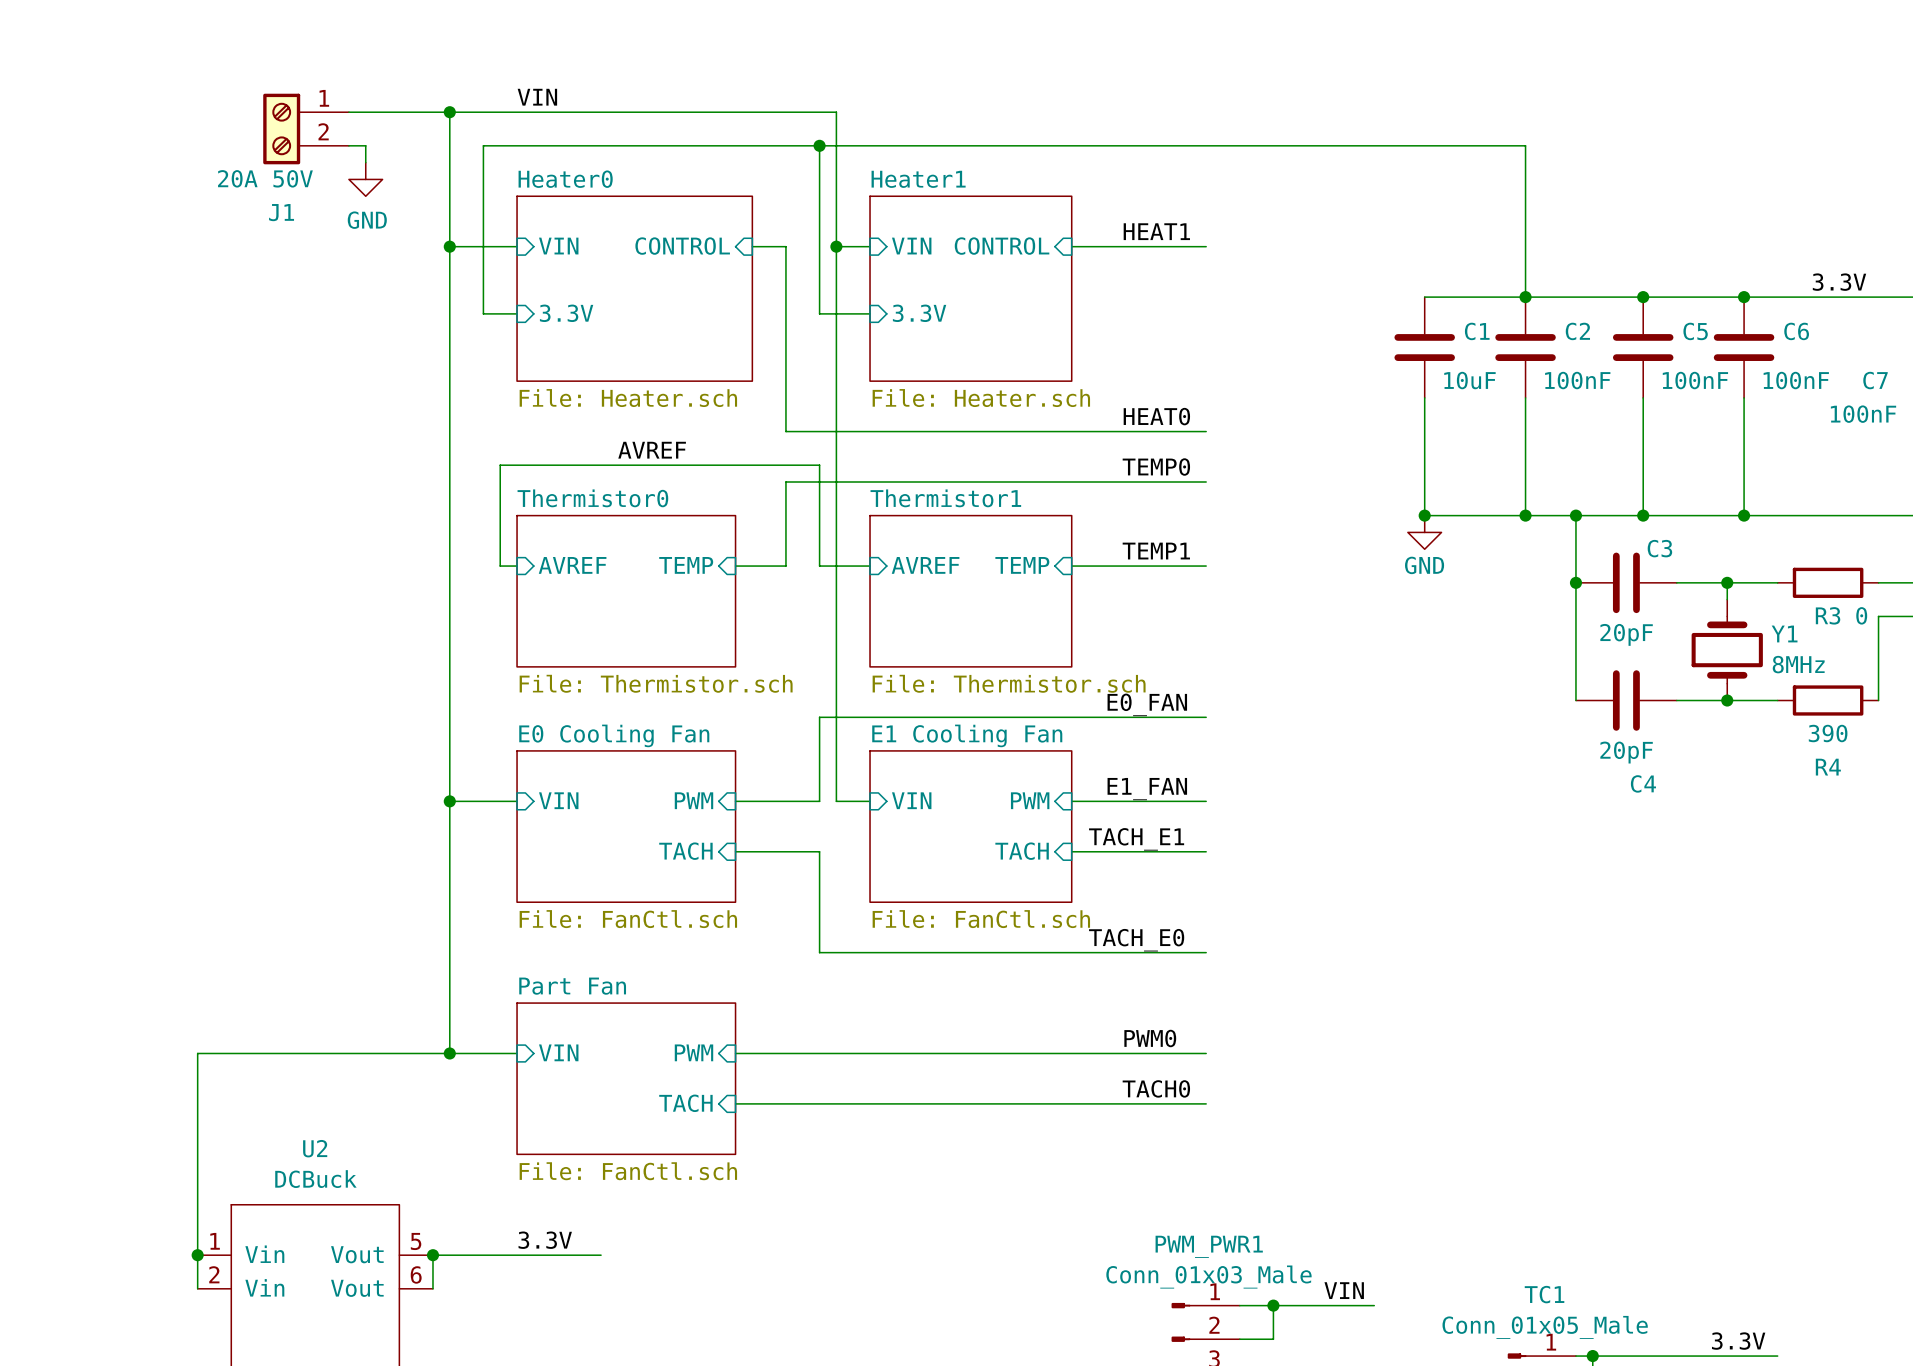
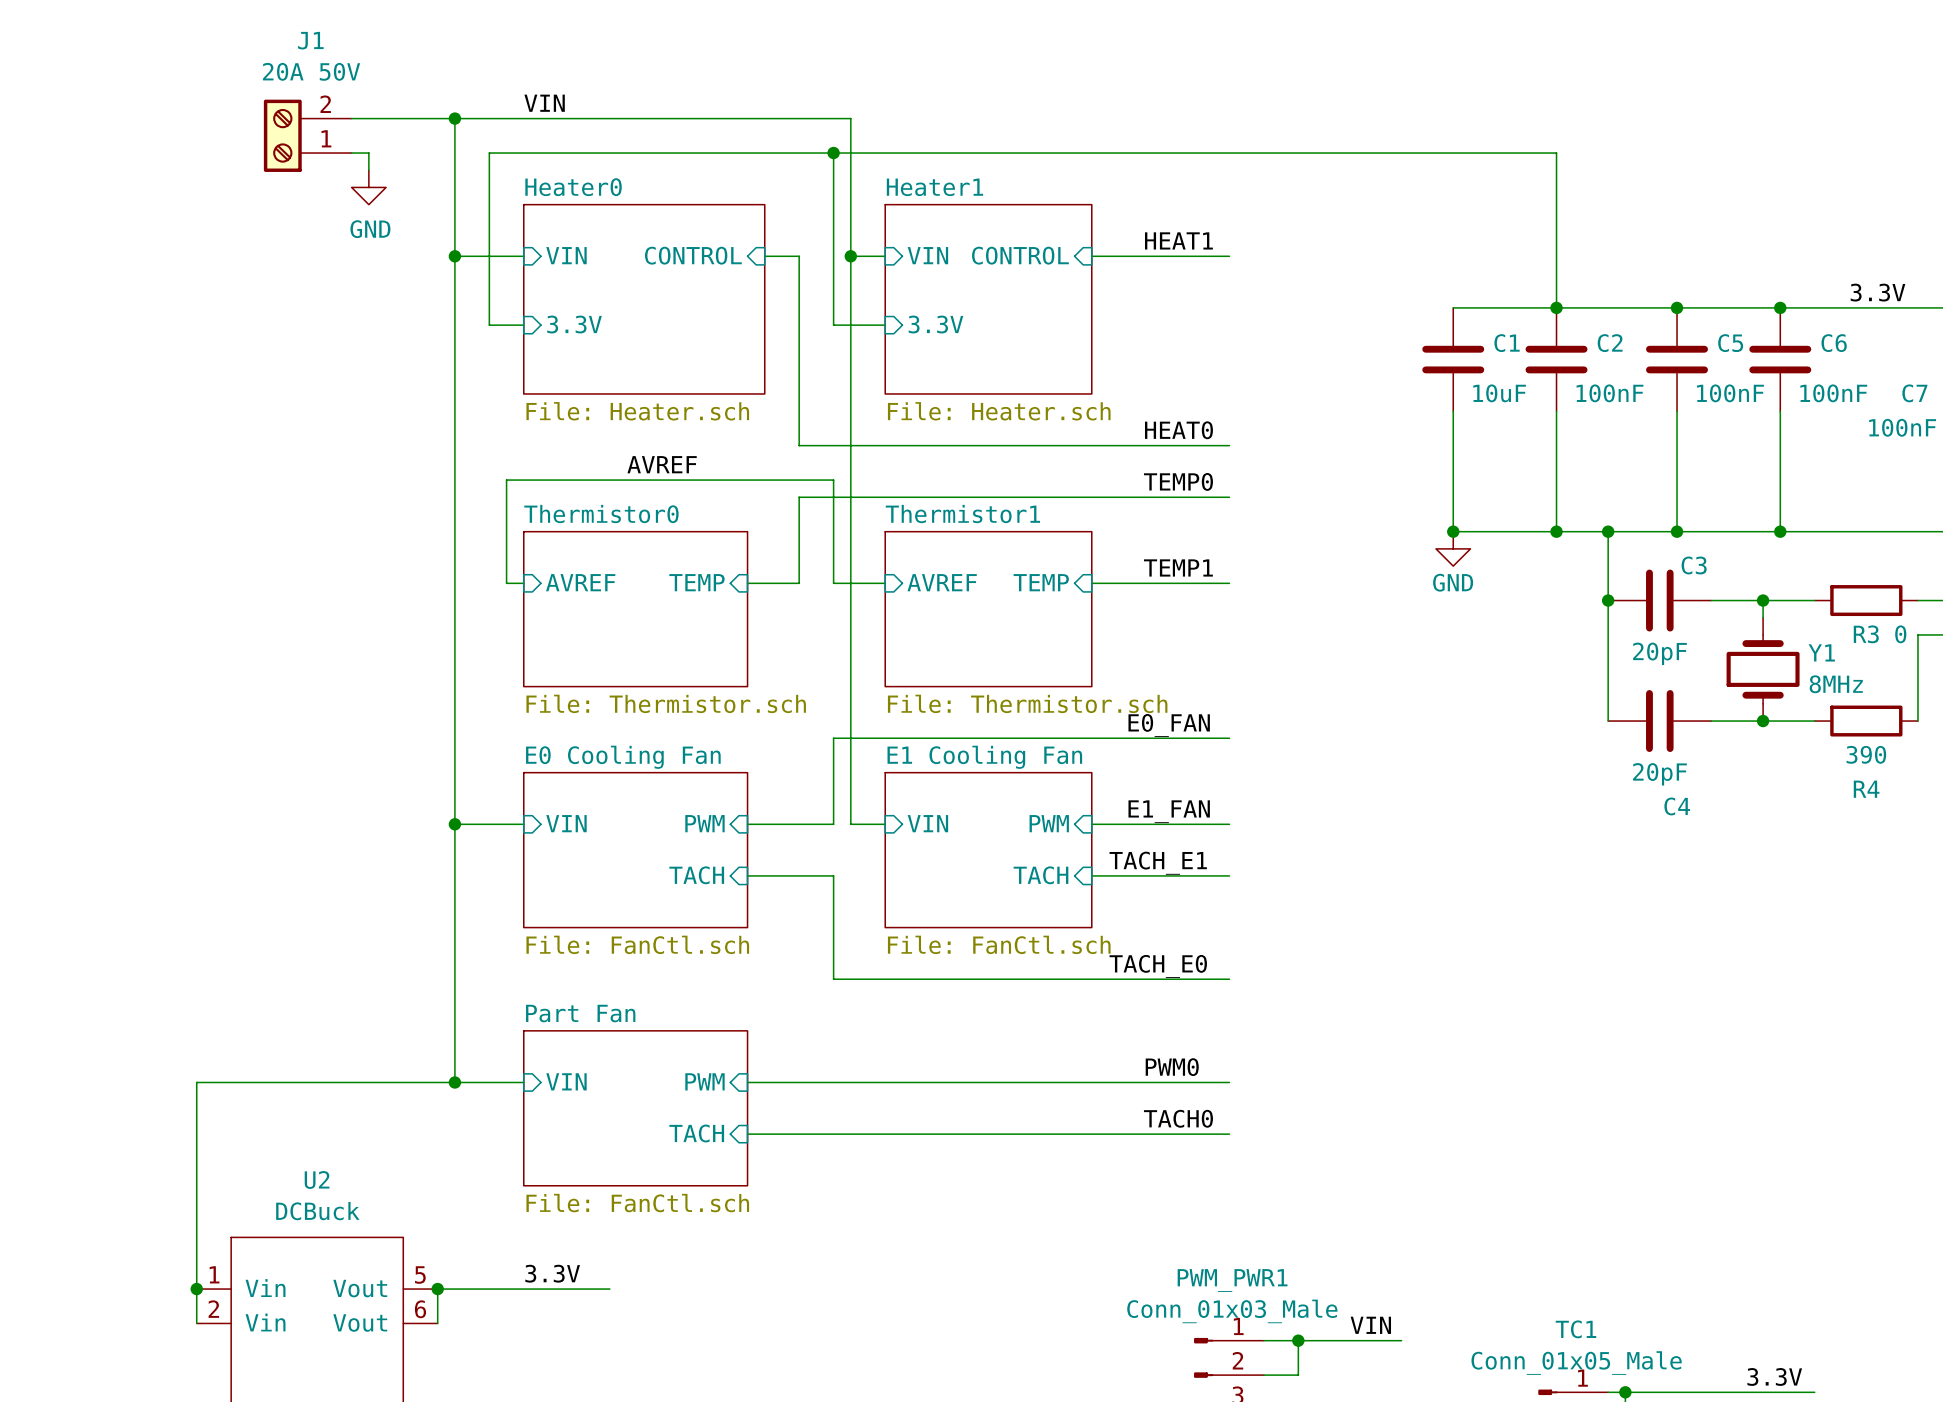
J1 flip: as is (281, 129) -> up-down (282, 135)
J1 value position: 20A 50V (265, 178) -> 20A 50V (311, 71)
J1 name position: J1 (281, 212) -> J1 (310, 40)

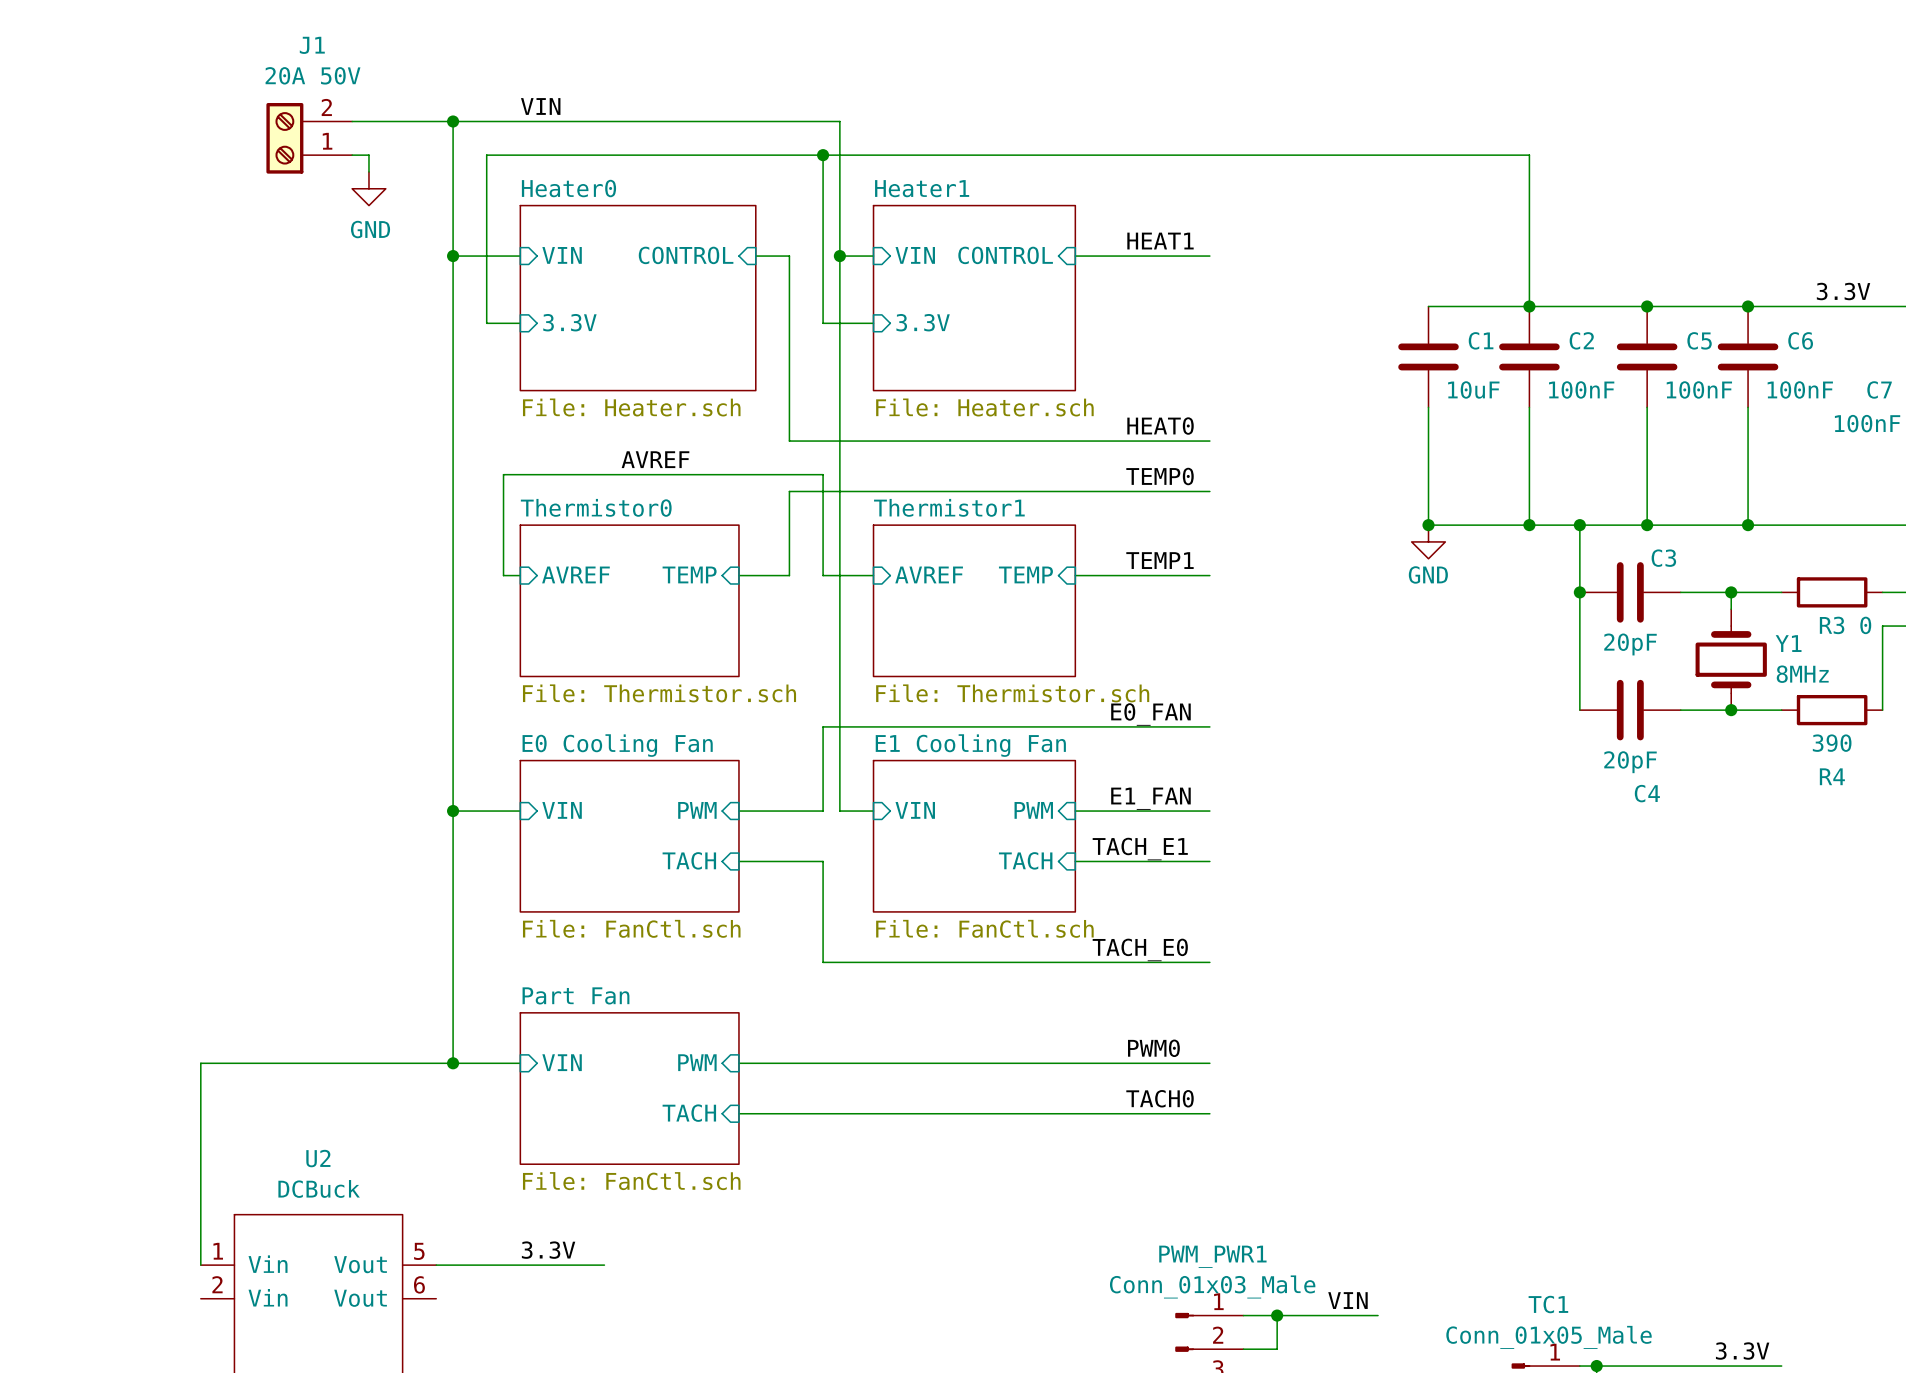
wire: (196, 1289) (196, 1323) -> none
junction: (196, 1289) -> none
wire: (437, 1289) (437, 1323) -> none
junction: (437, 1289) -> none

